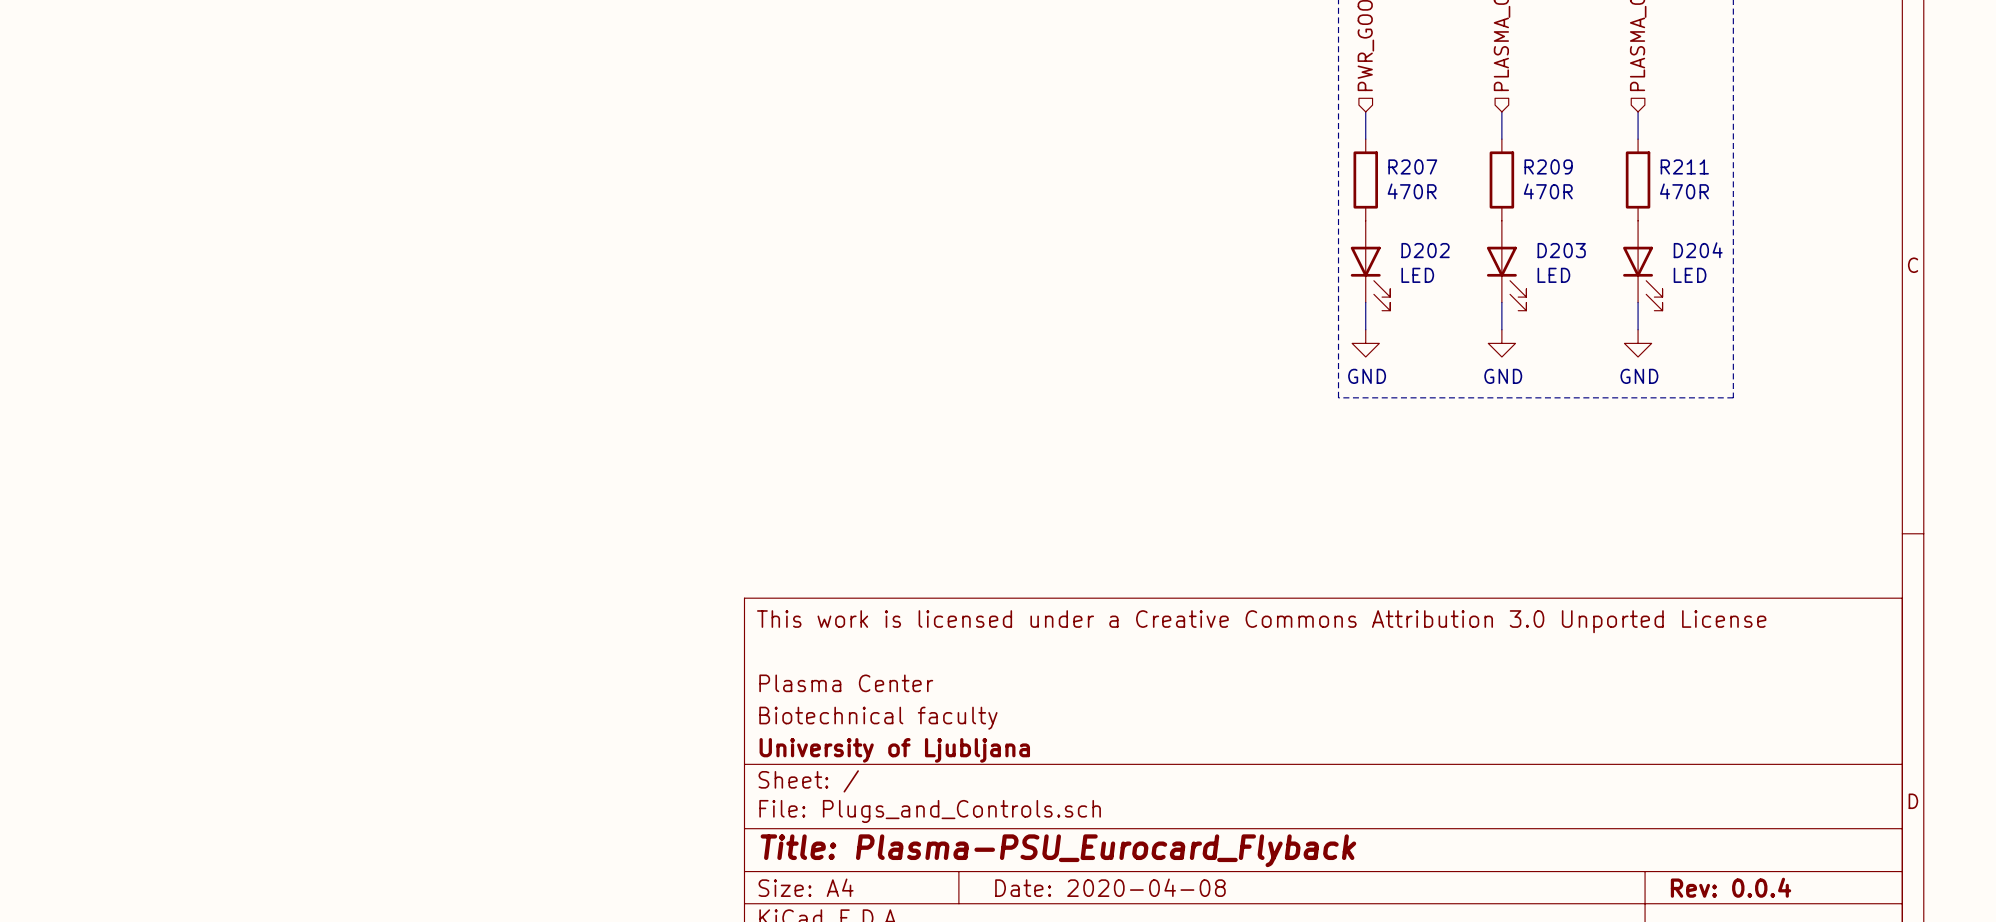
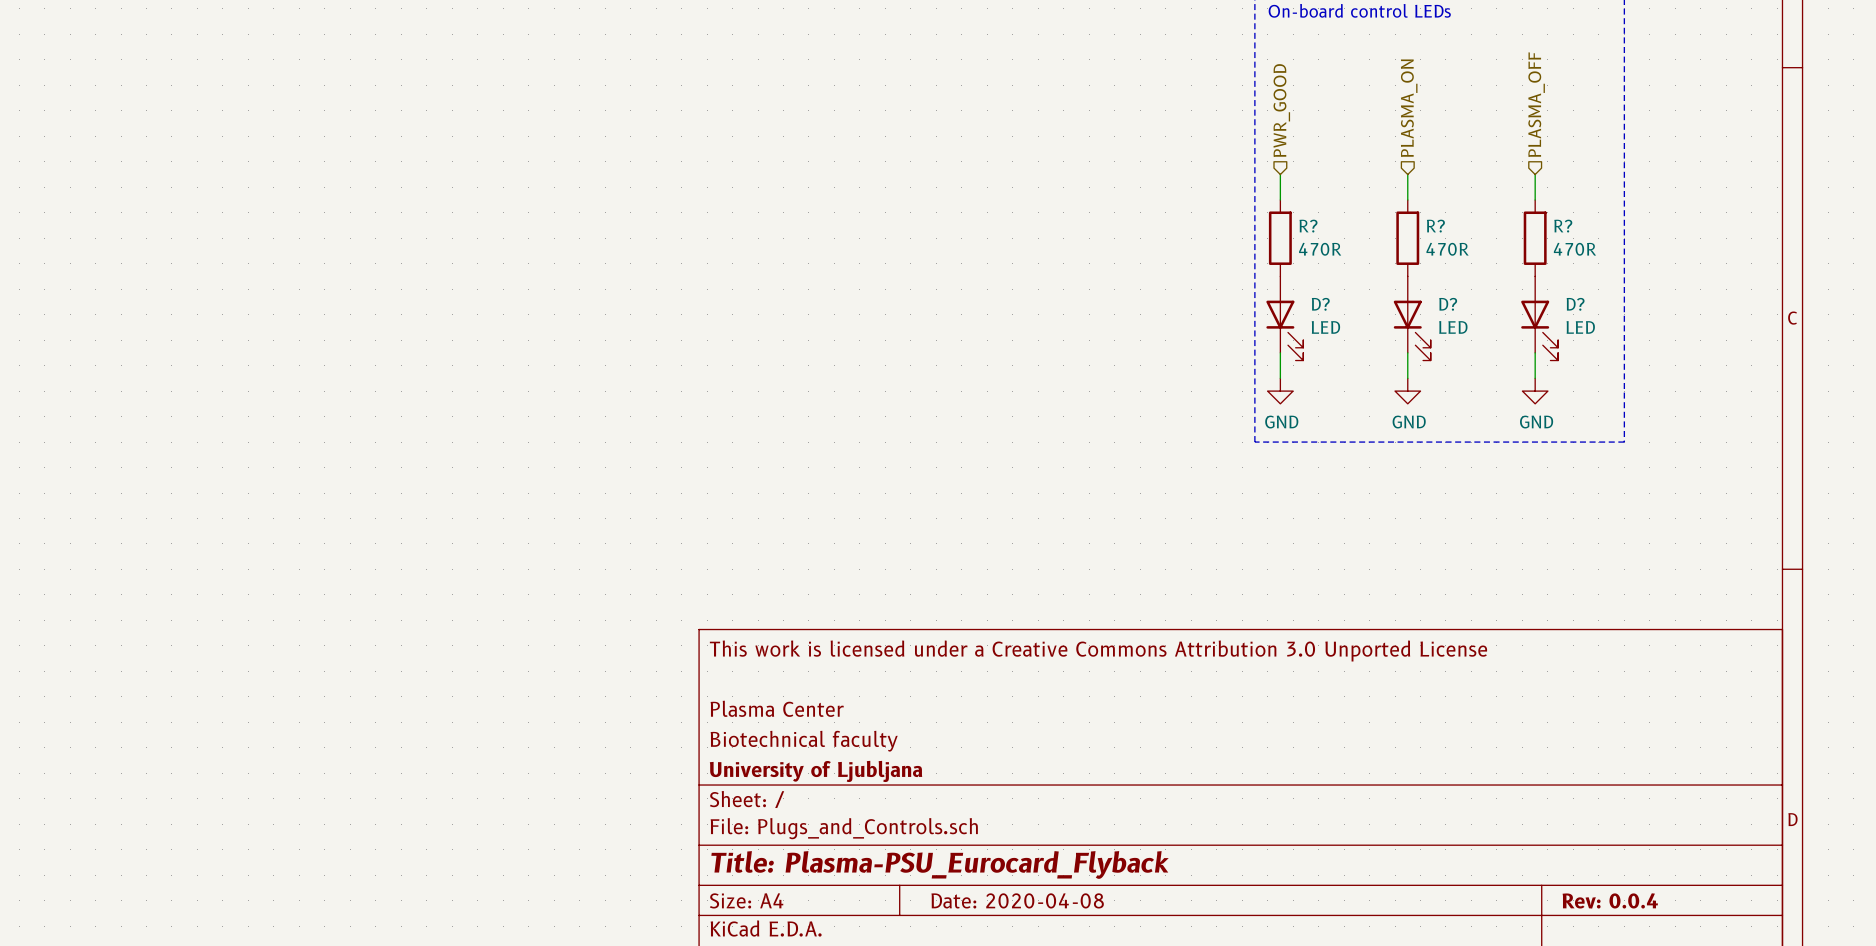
R207 name: R207 (1412, 166) -> R? (1308, 226)
R209 name: R209 (1548, 166) -> R? (1435, 226)
R211 name: R211 (1684, 166) -> R? (1563, 226)
D202 name: D202 (1425, 250) -> D? (1320, 304)
D203 name: D203 (1561, 250) -> D? (1448, 304)
D204 name: D204 (1698, 250) -> D? (1575, 304)

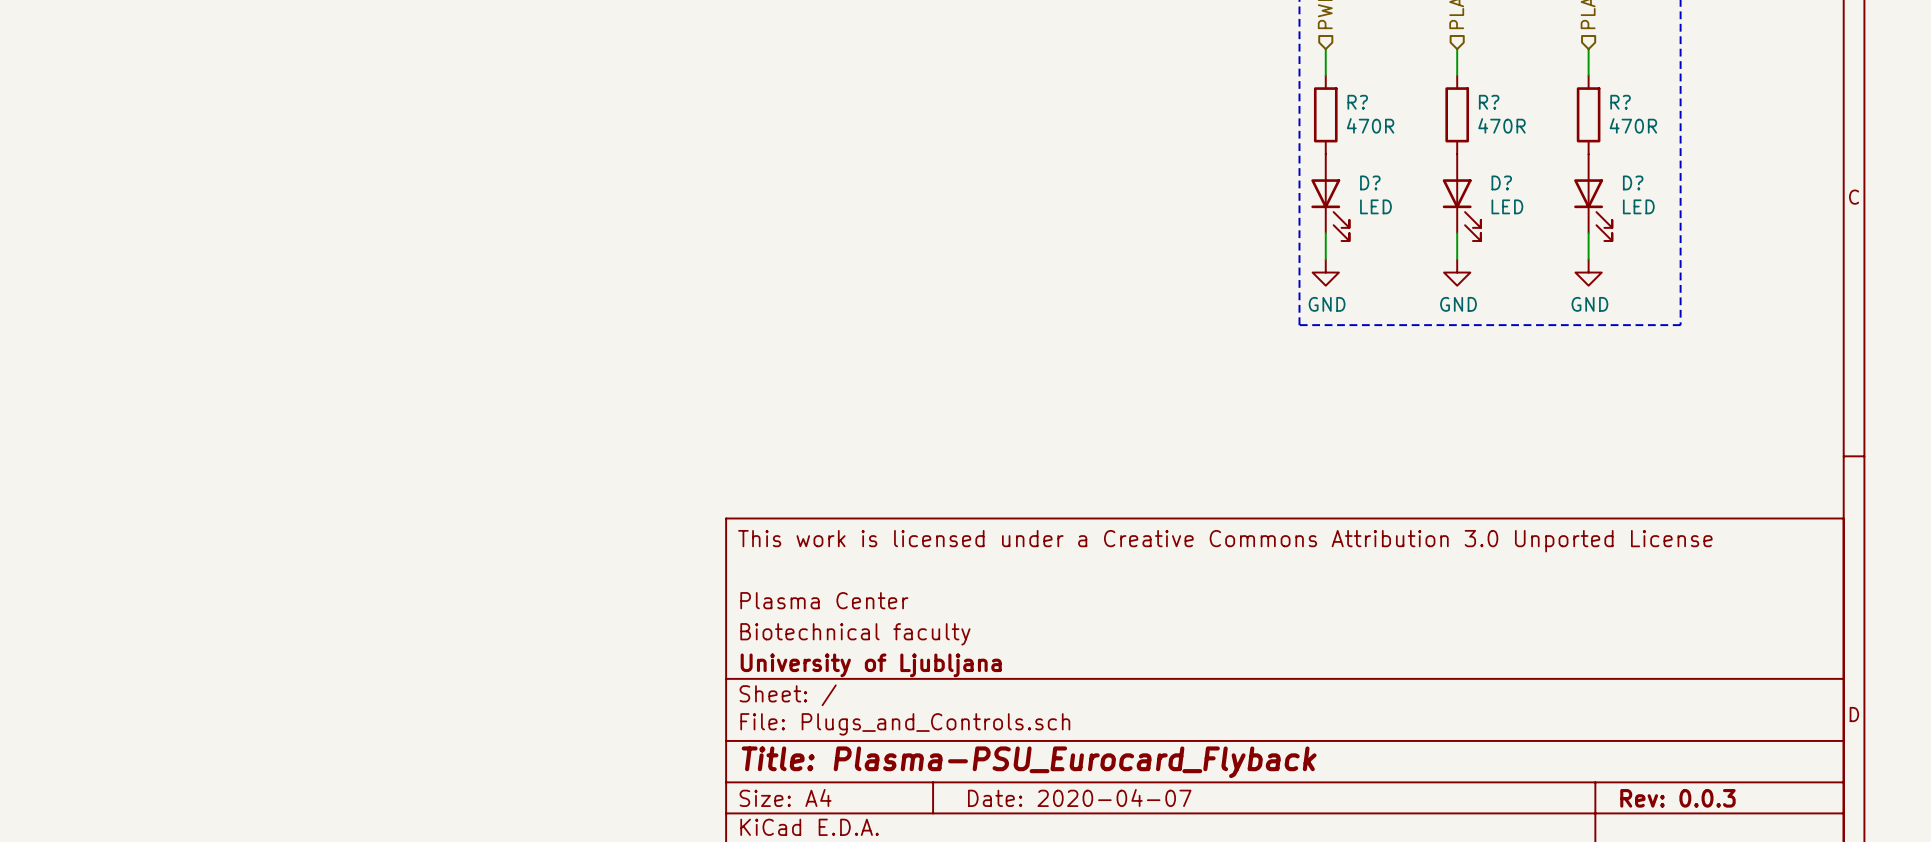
title block: Date: 2020-04-08 (1017, 900) -> Date: 2020-04-07 (1079, 797)
title block: Rev: 0.0.4 (1610, 900) -> Rev: 0.0.3 (1677, 798)

